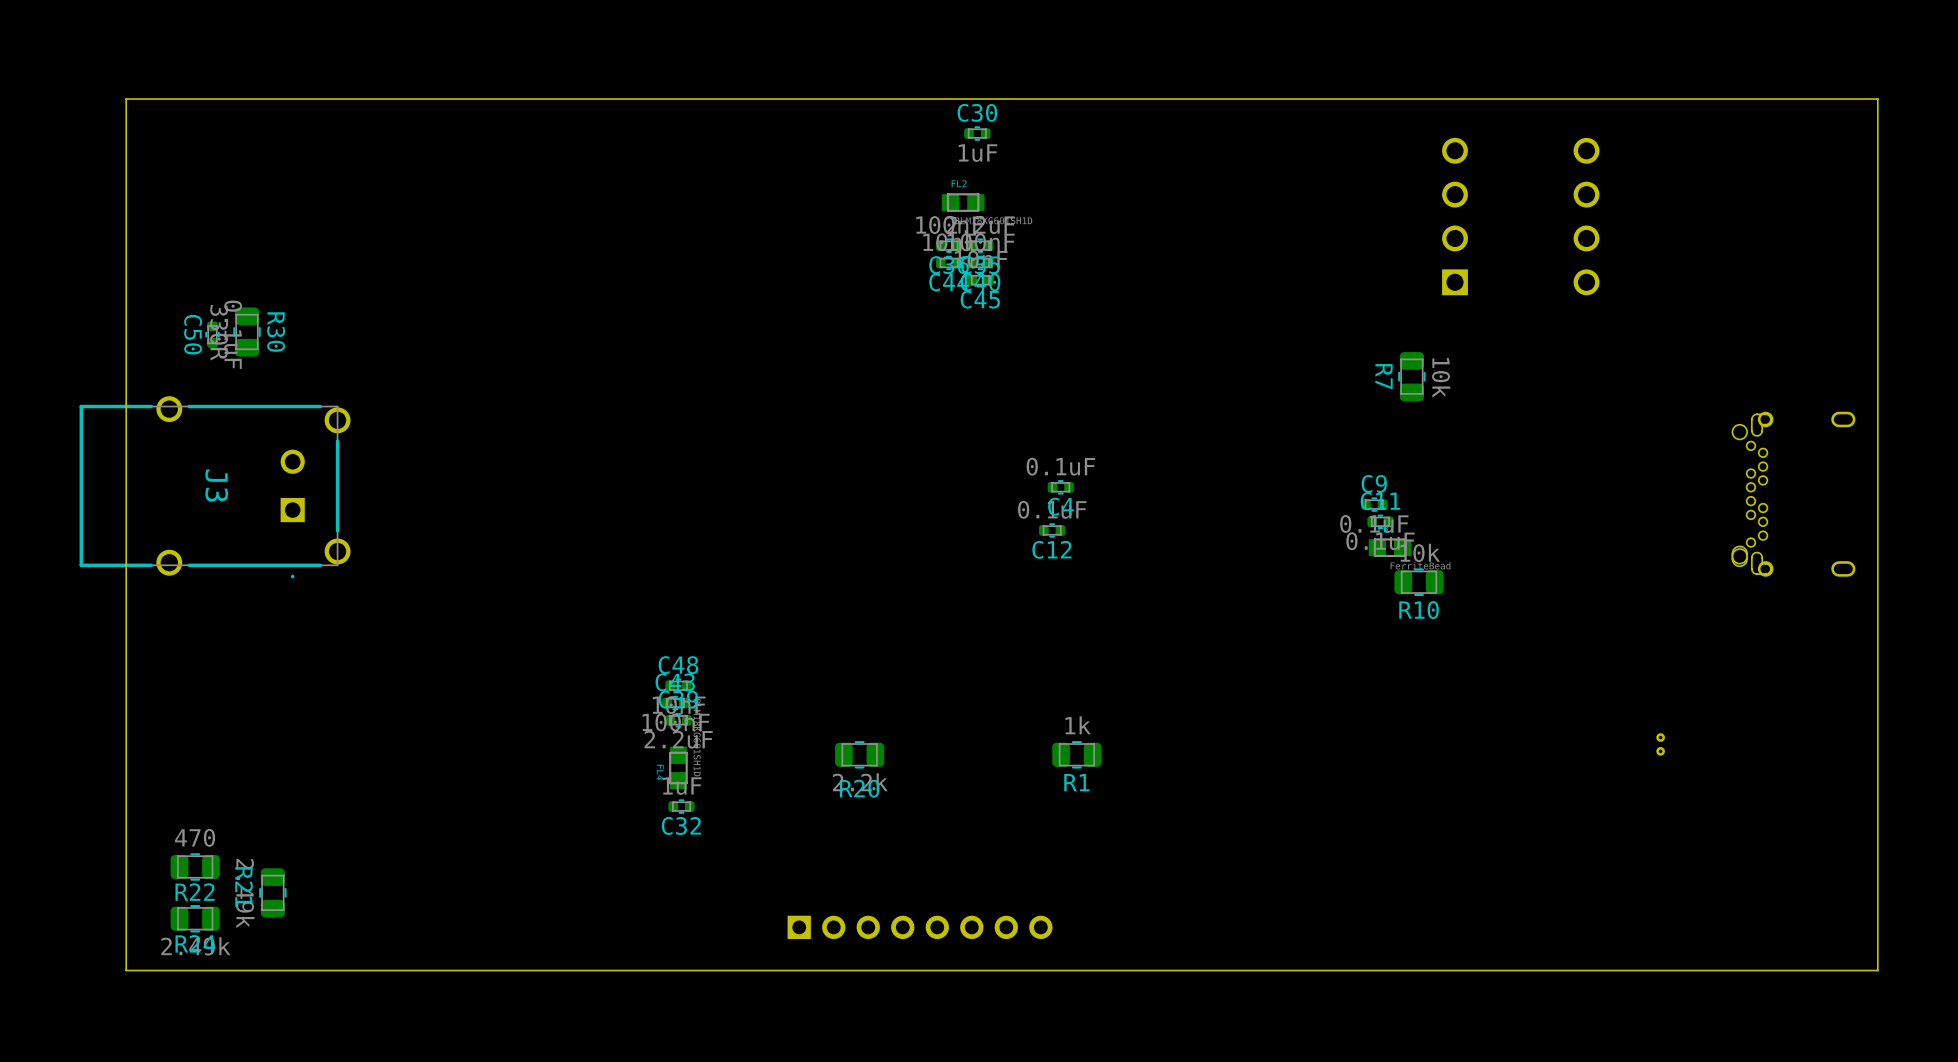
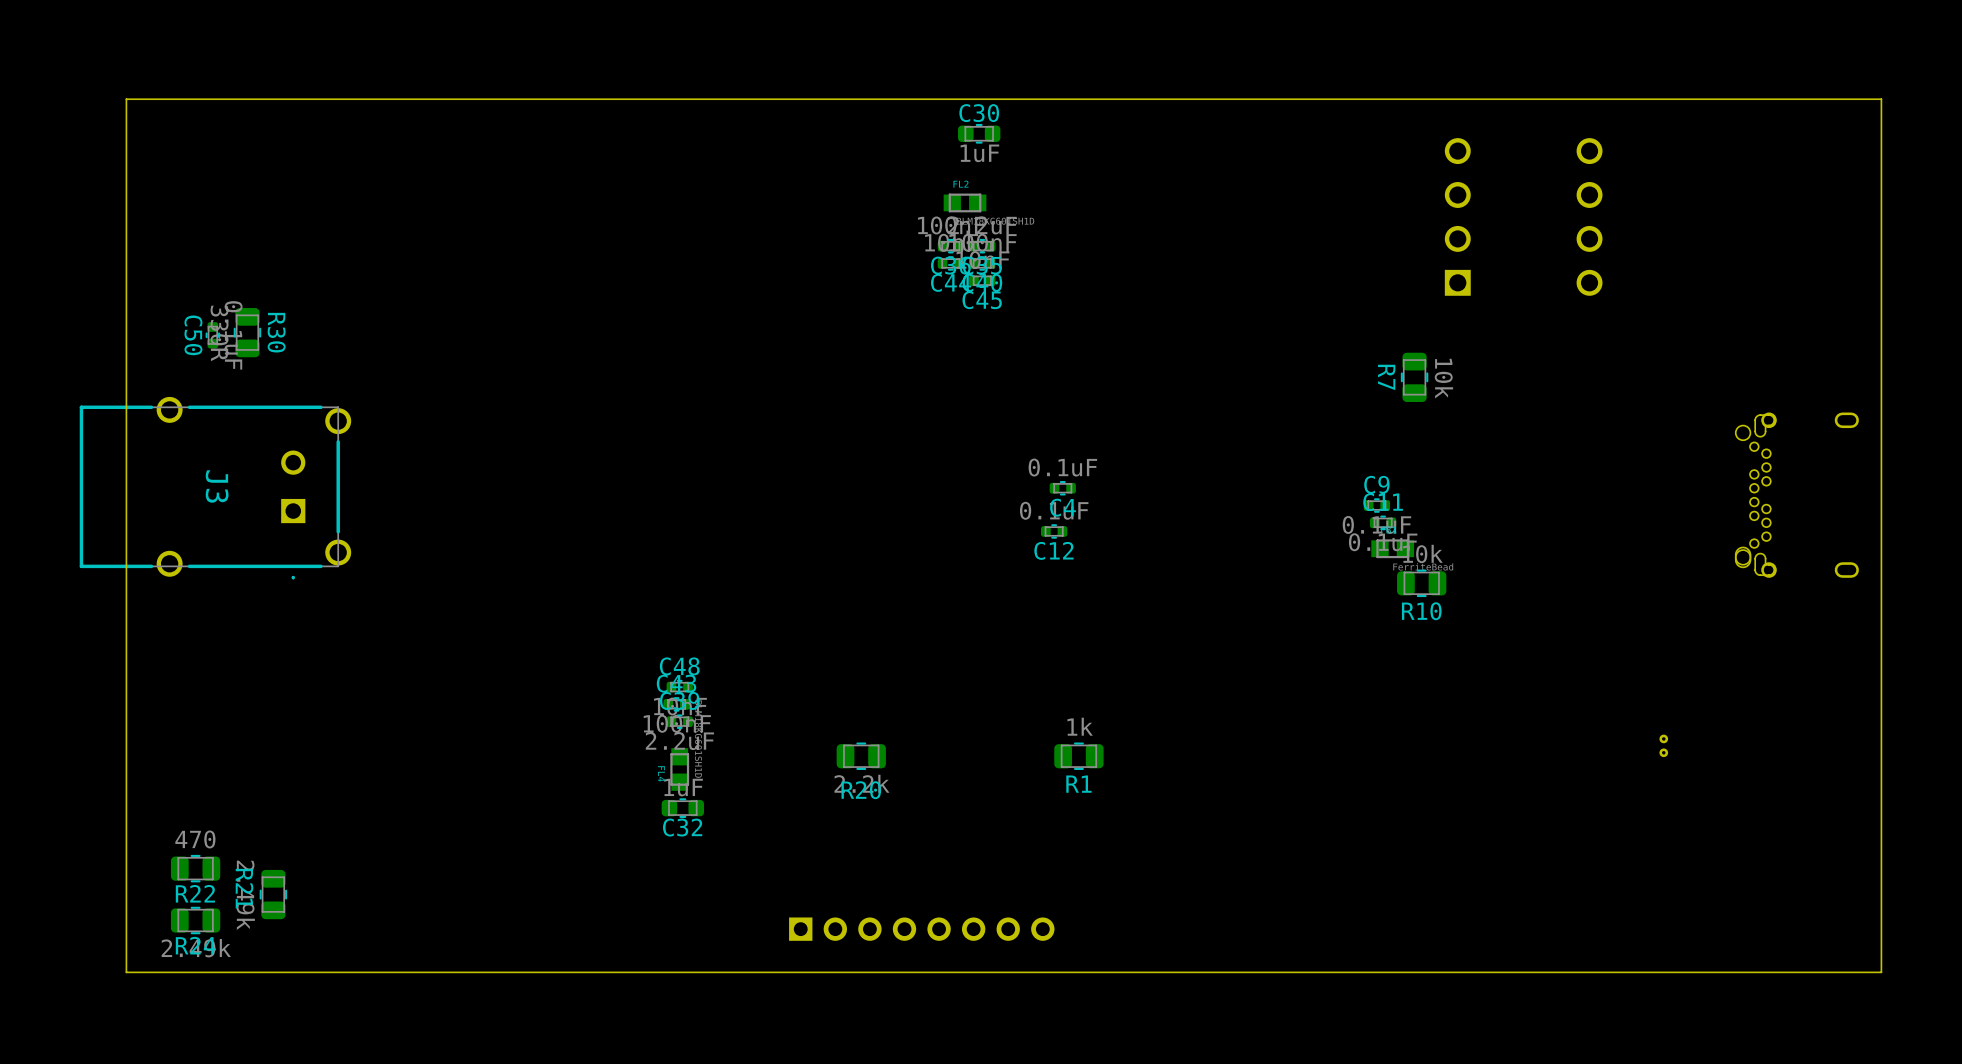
C30 footprint: [964, 126, 991, 141] -> [958, 123, 1001, 144]
C32 footprint: [668, 799, 695, 814] -> [661, 798, 705, 818]

